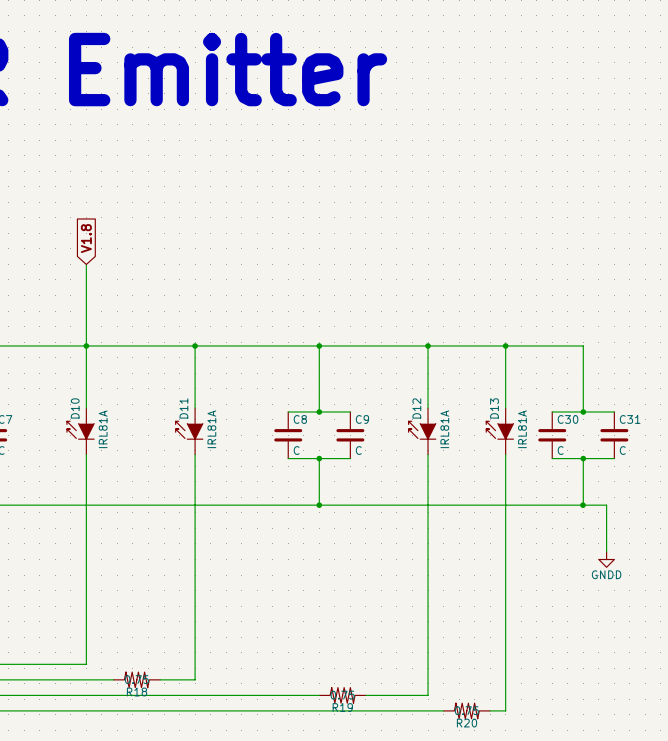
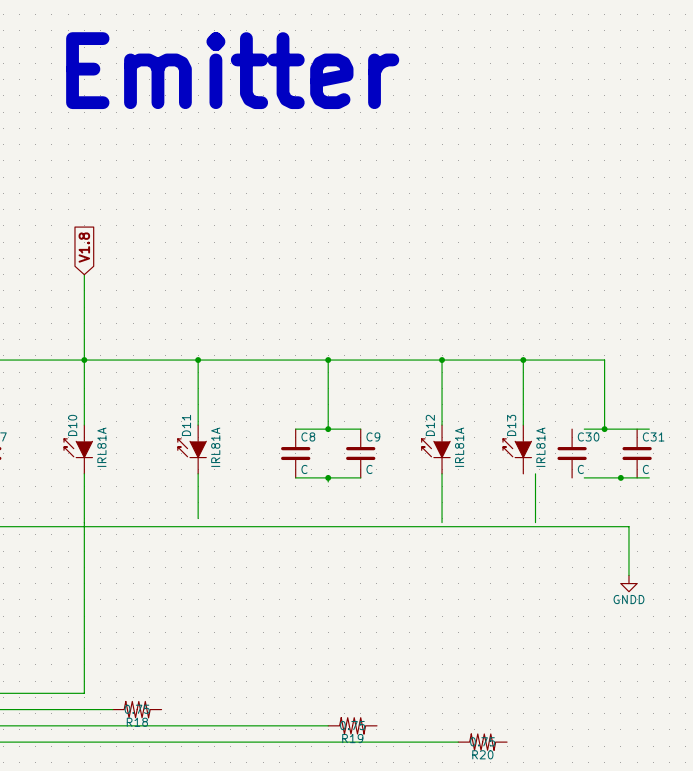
wire: (552, 411) (563, 411) -> (637, 429) (649, 429)
wire: (505, 454) (505, 710) (490, 710) -> none
wire: none -> (535, 473) (535, 522)
wire: (552, 458) (563, 458) -> (637, 477) (649, 477)
junction position: (583, 458) -> (620, 477)
wire: (583, 459) (583, 505) -> none
wire: (319, 462) (319, 505) -> none
wire: (195, 497) (195, 679) (160, 679) -> none
wire: (428, 501) (428, 695) (365, 695) -> none
junction: (319, 505) -> none
junction: (582, 505) -> none

